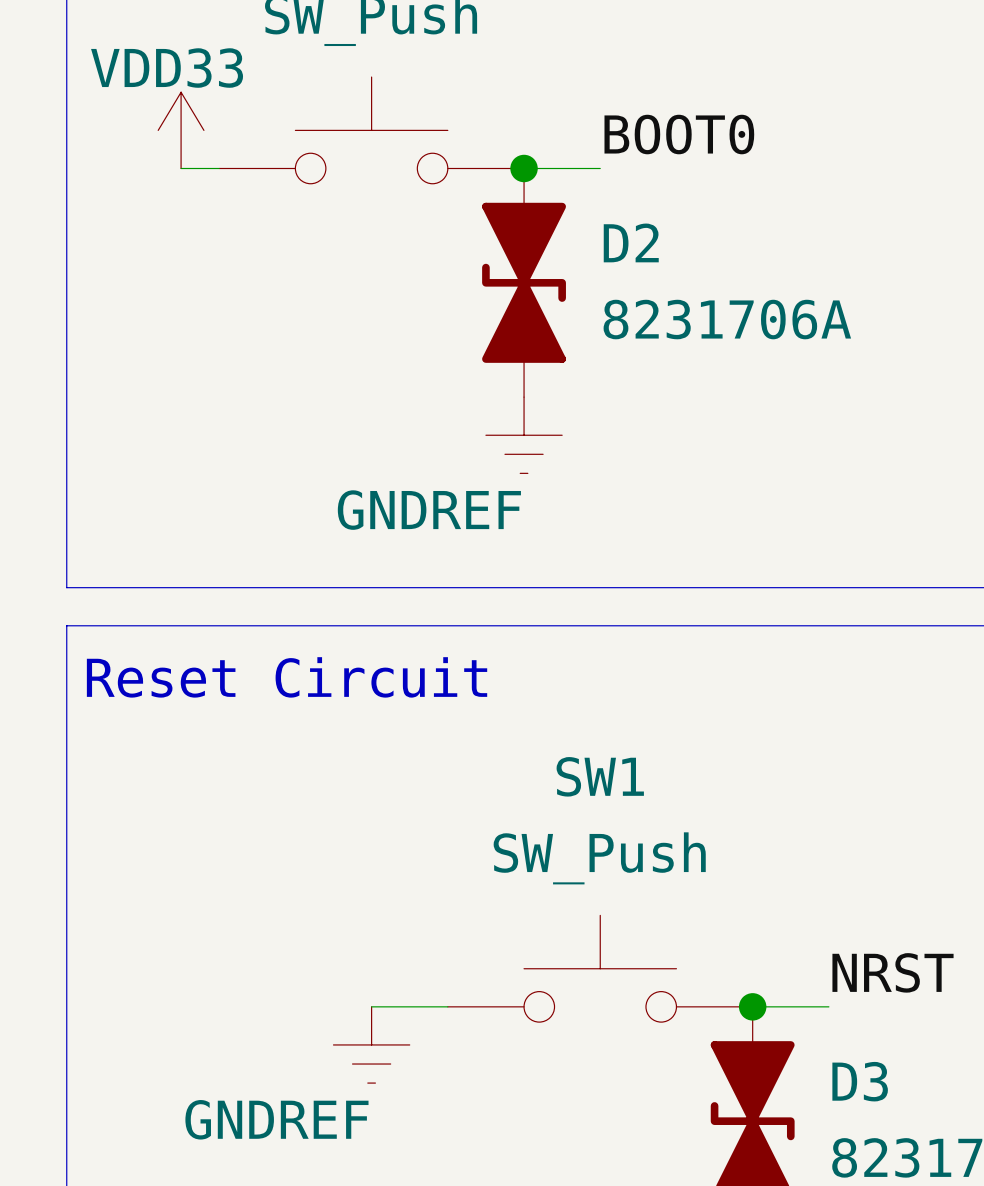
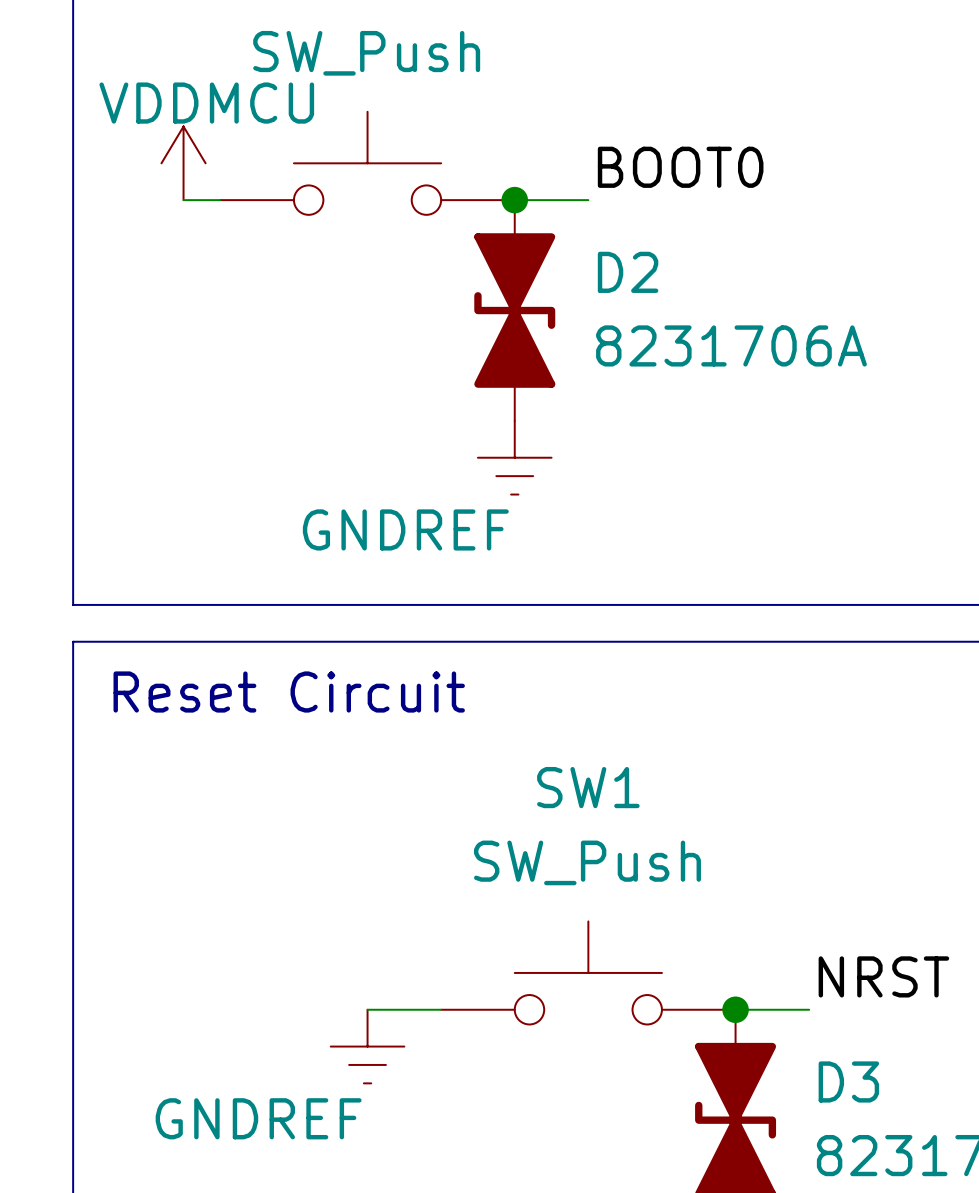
power symbol: VDD33 (181, 130) -> VDDMCU (183, 163)

